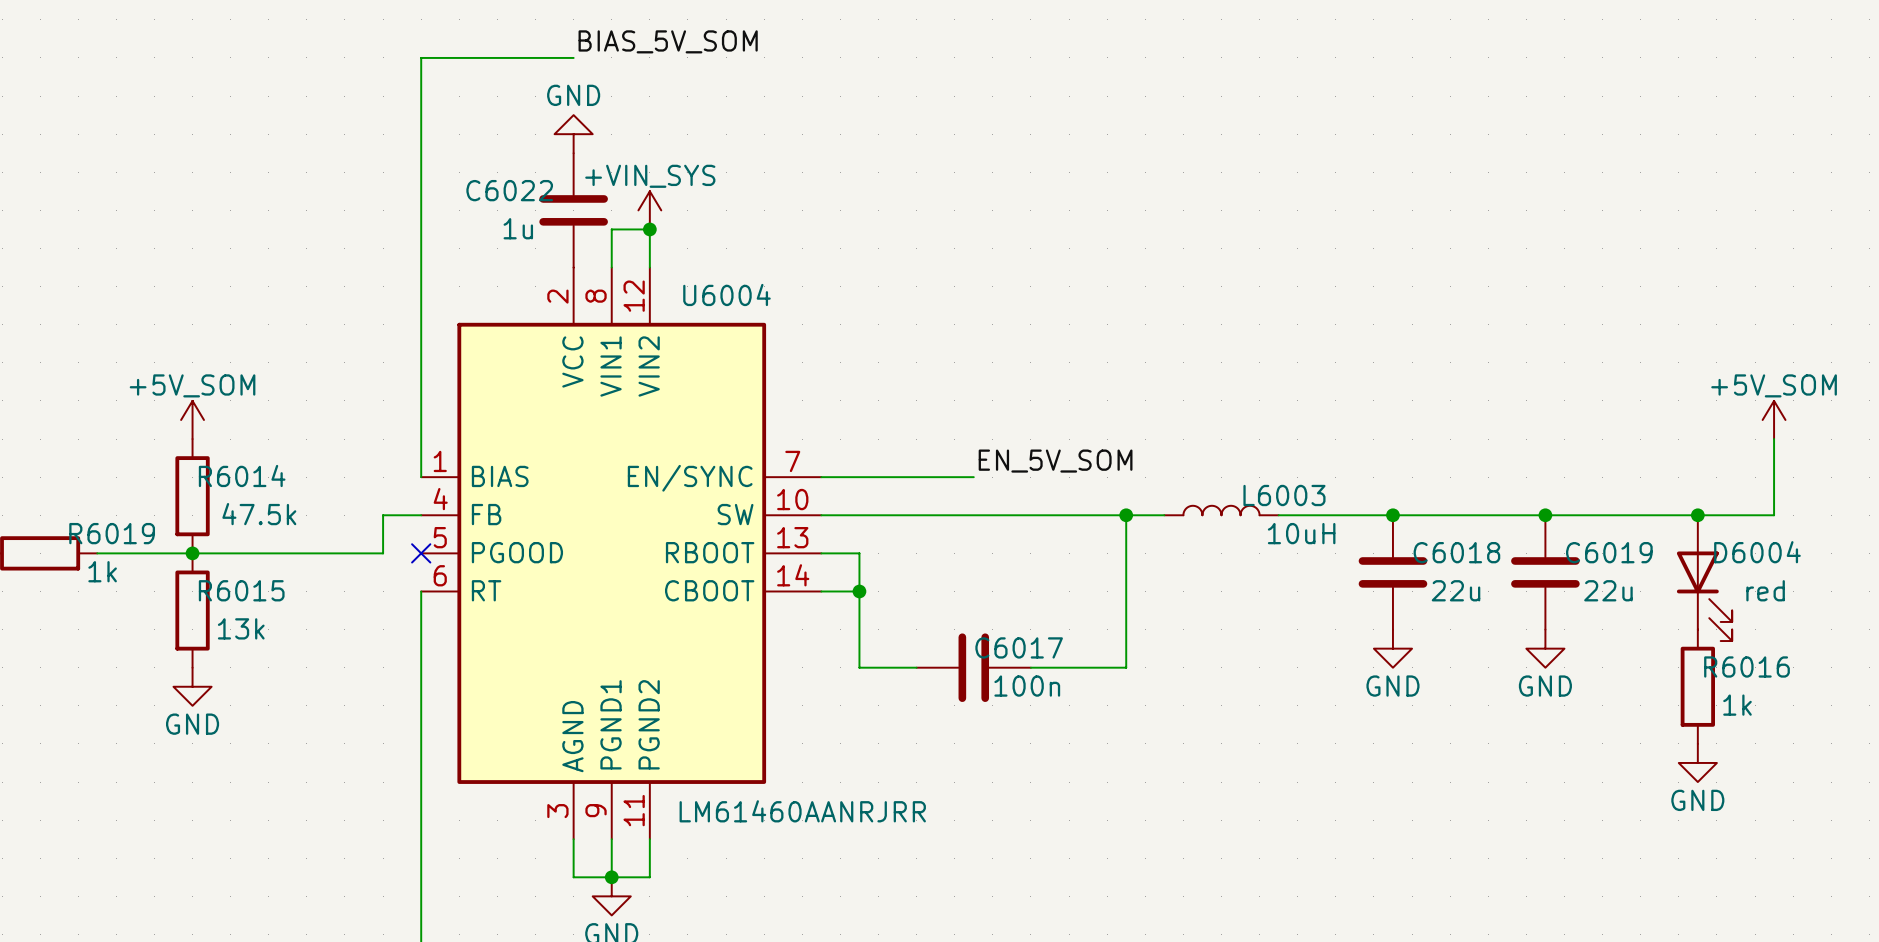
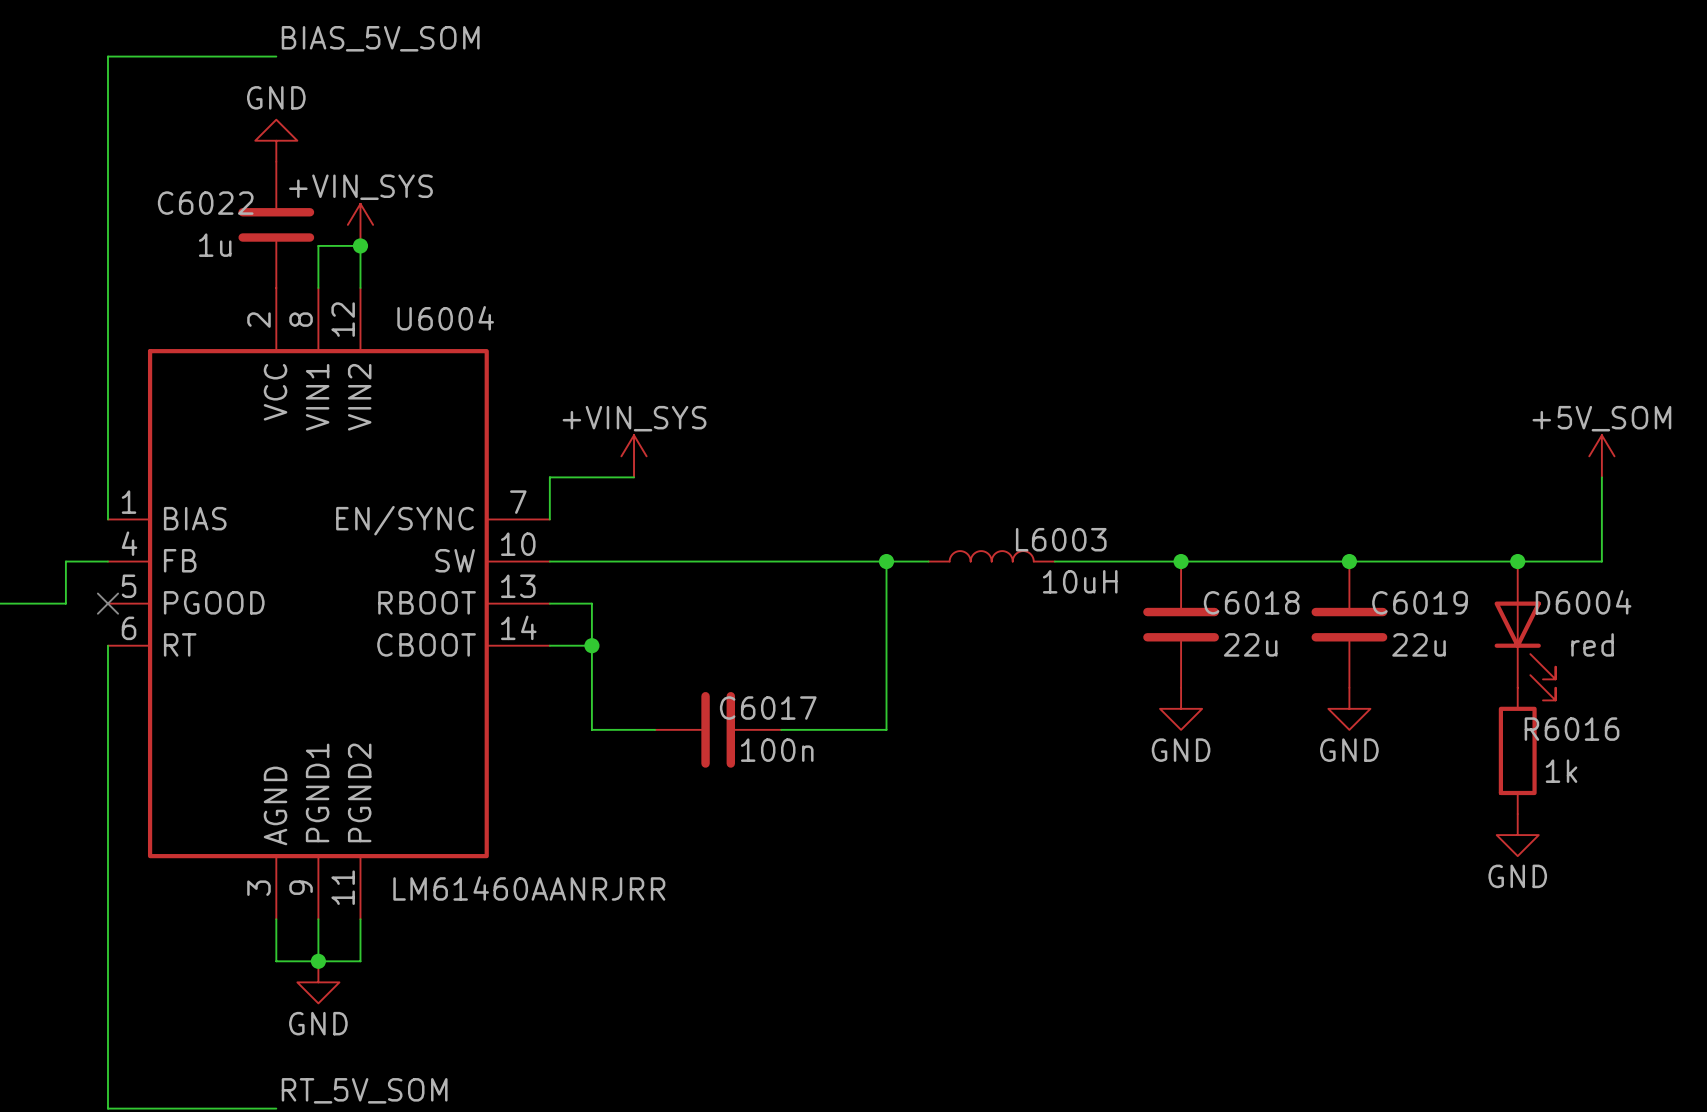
power symbol: none -> +VIN_SYS (634, 456)
label: EN_5V_SOM (1055, 461) -> none
wire: (821, 477) (973, 477) -> (549, 519) (549, 477) (634, 477)

